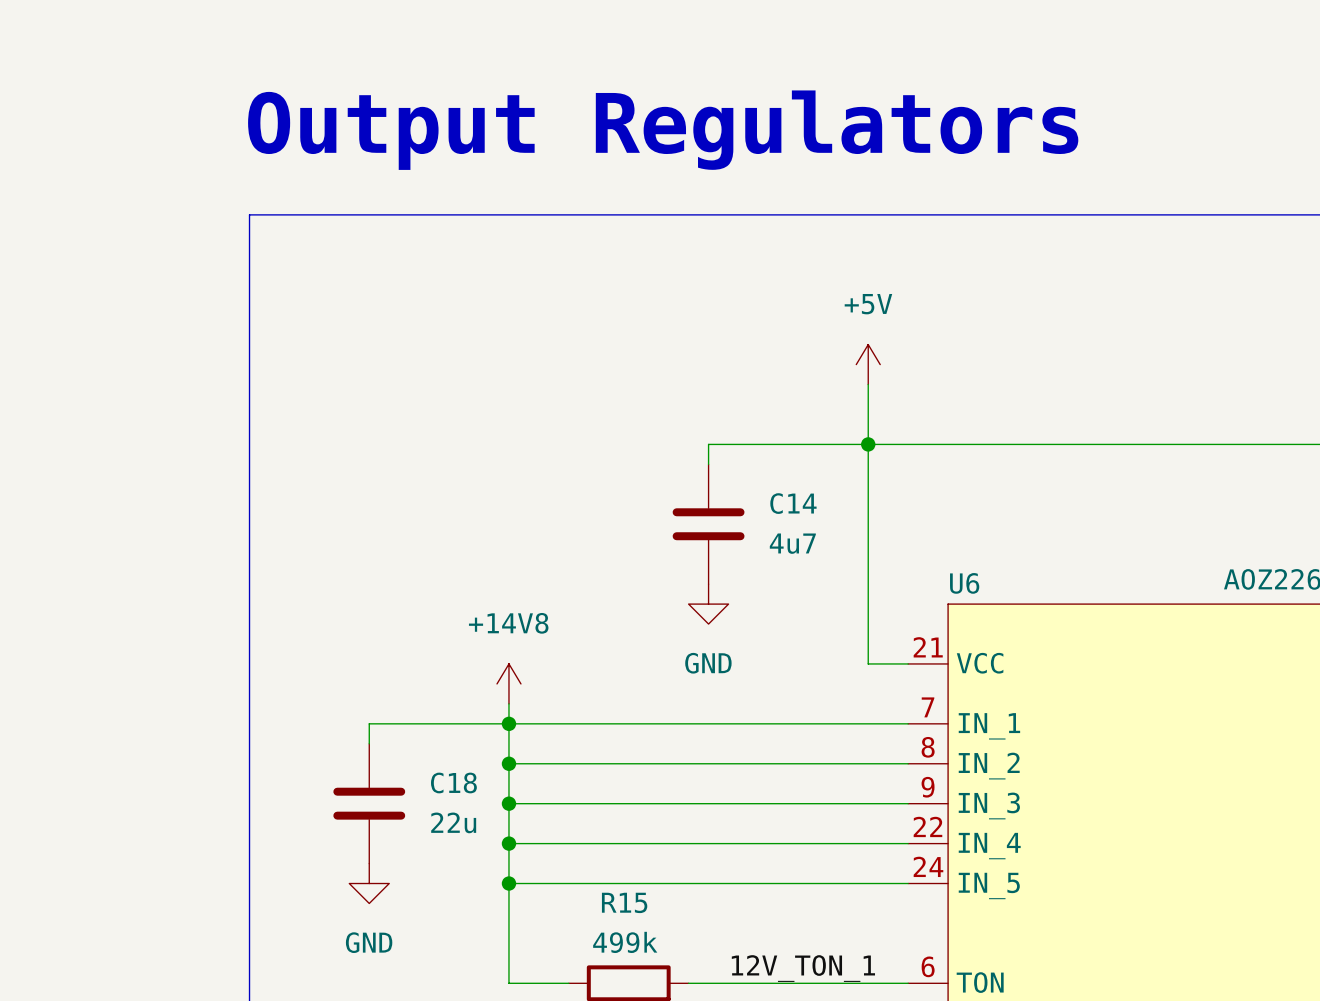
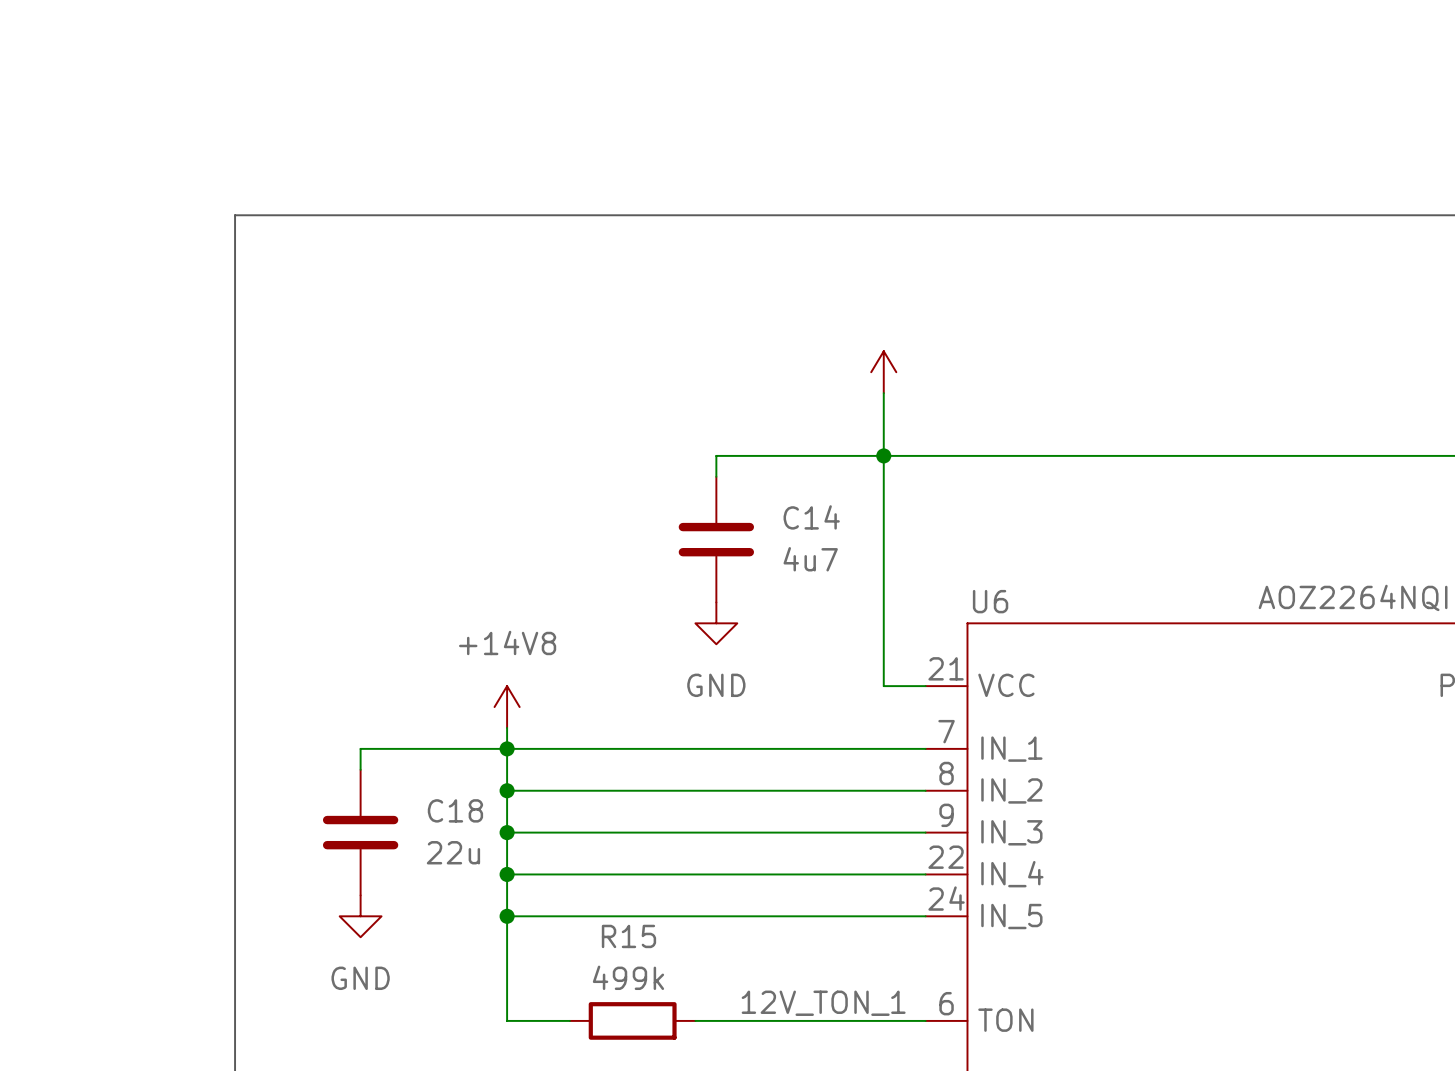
text: Output Regulators (663, 130) -> none
power symbol text: +5V (868, 304) -> none

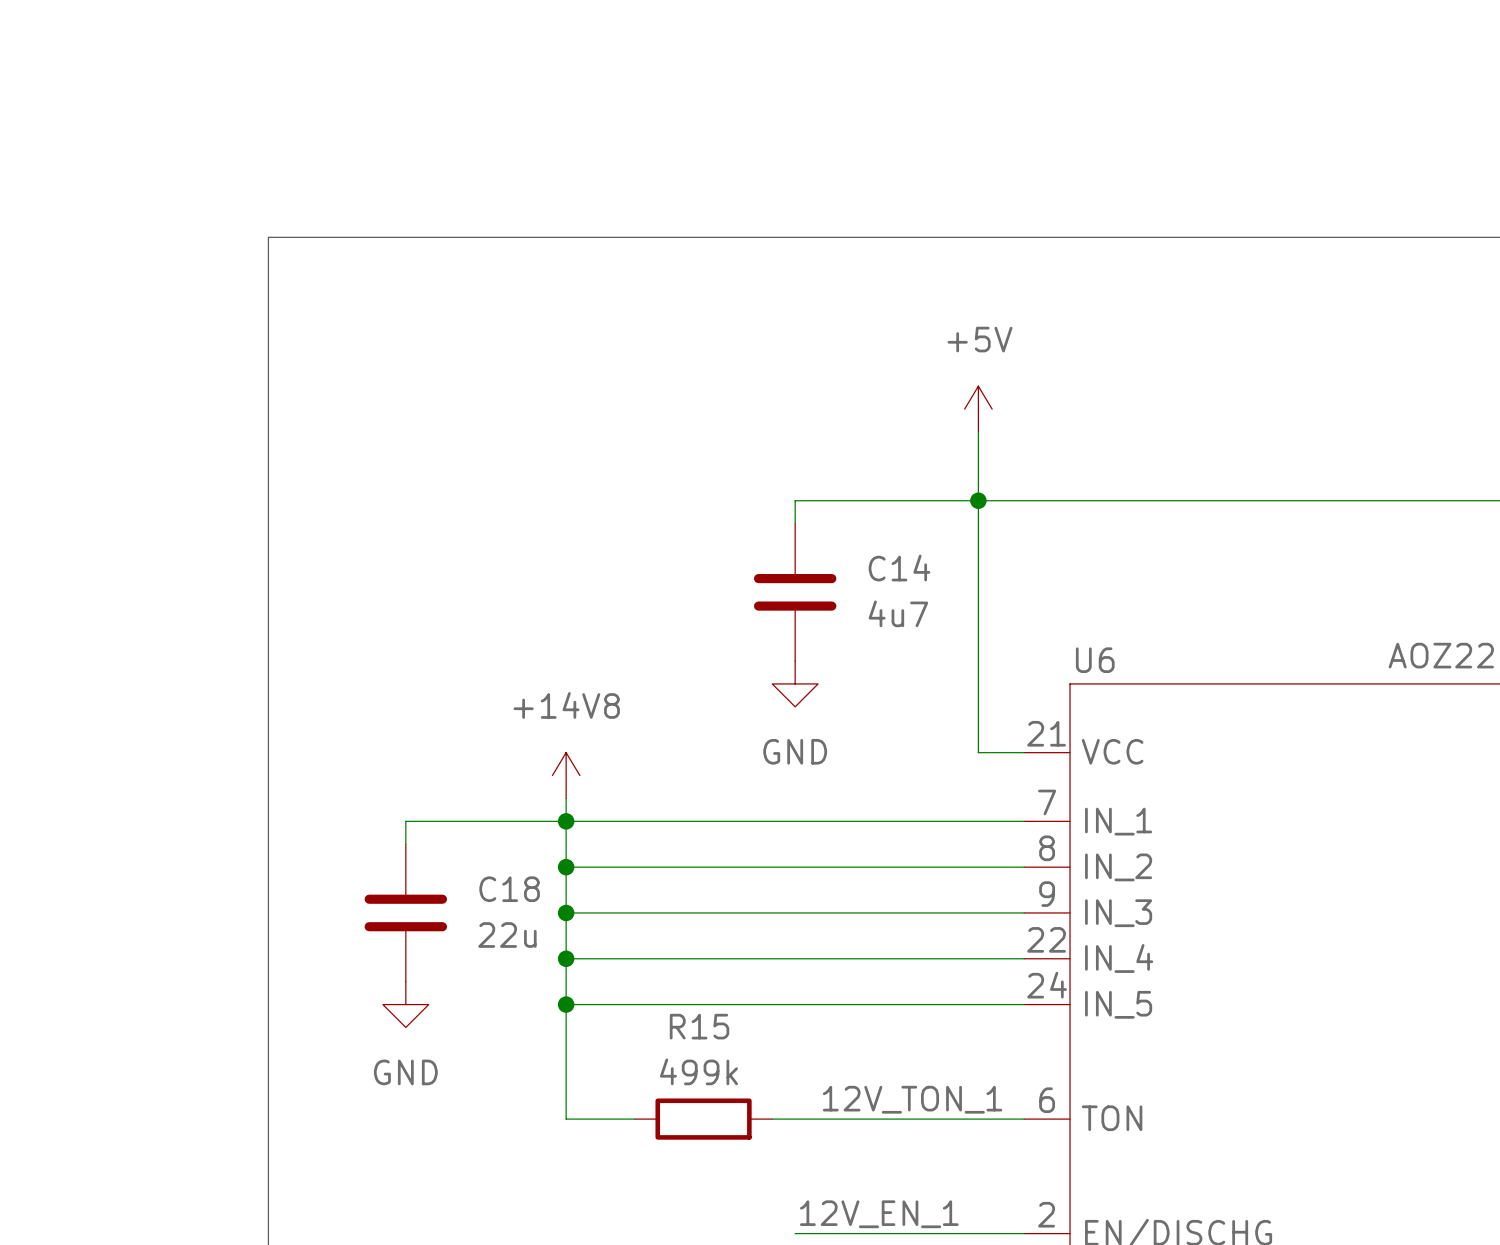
power symbol text: none -> +5V (980, 339)

